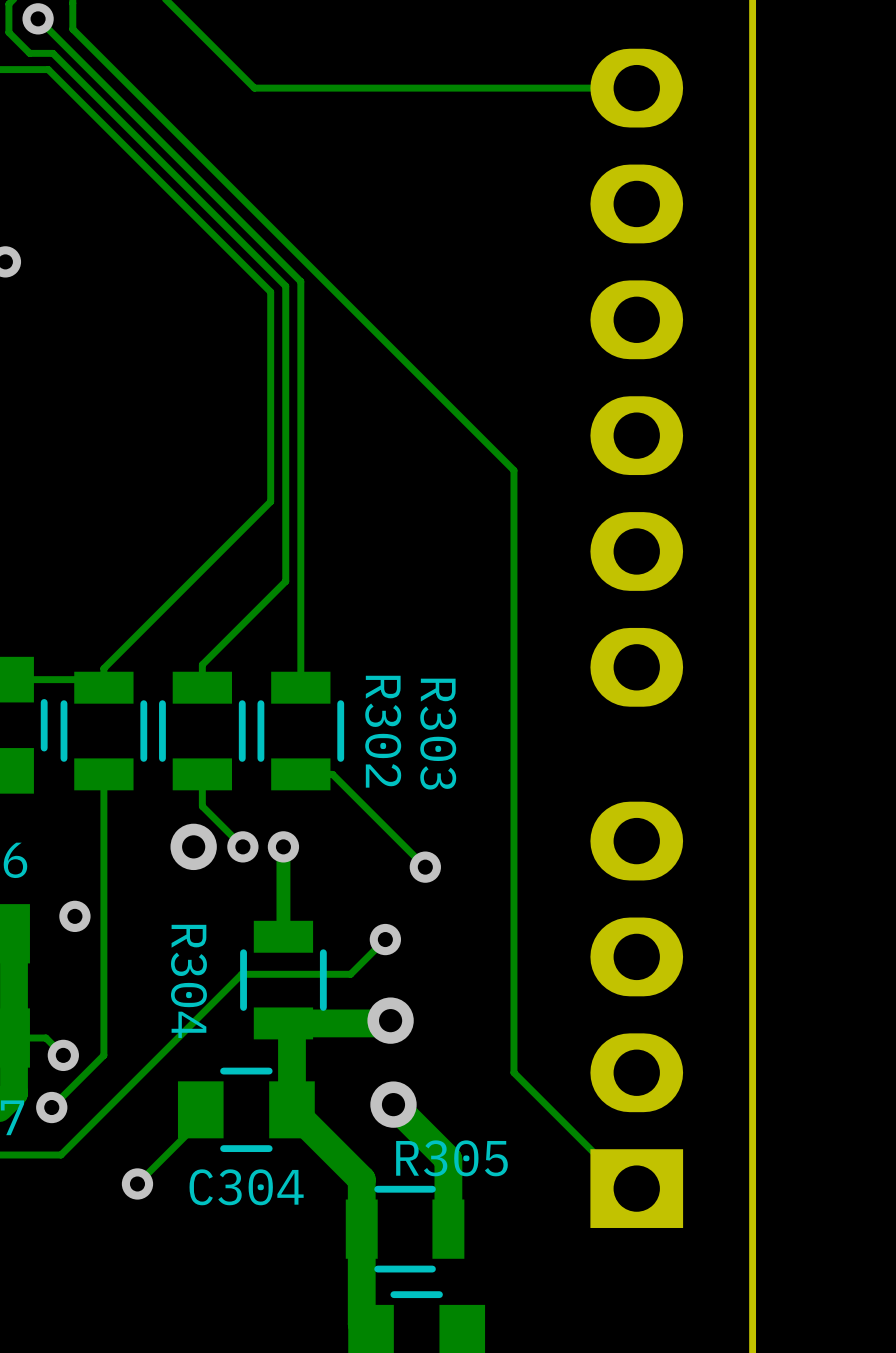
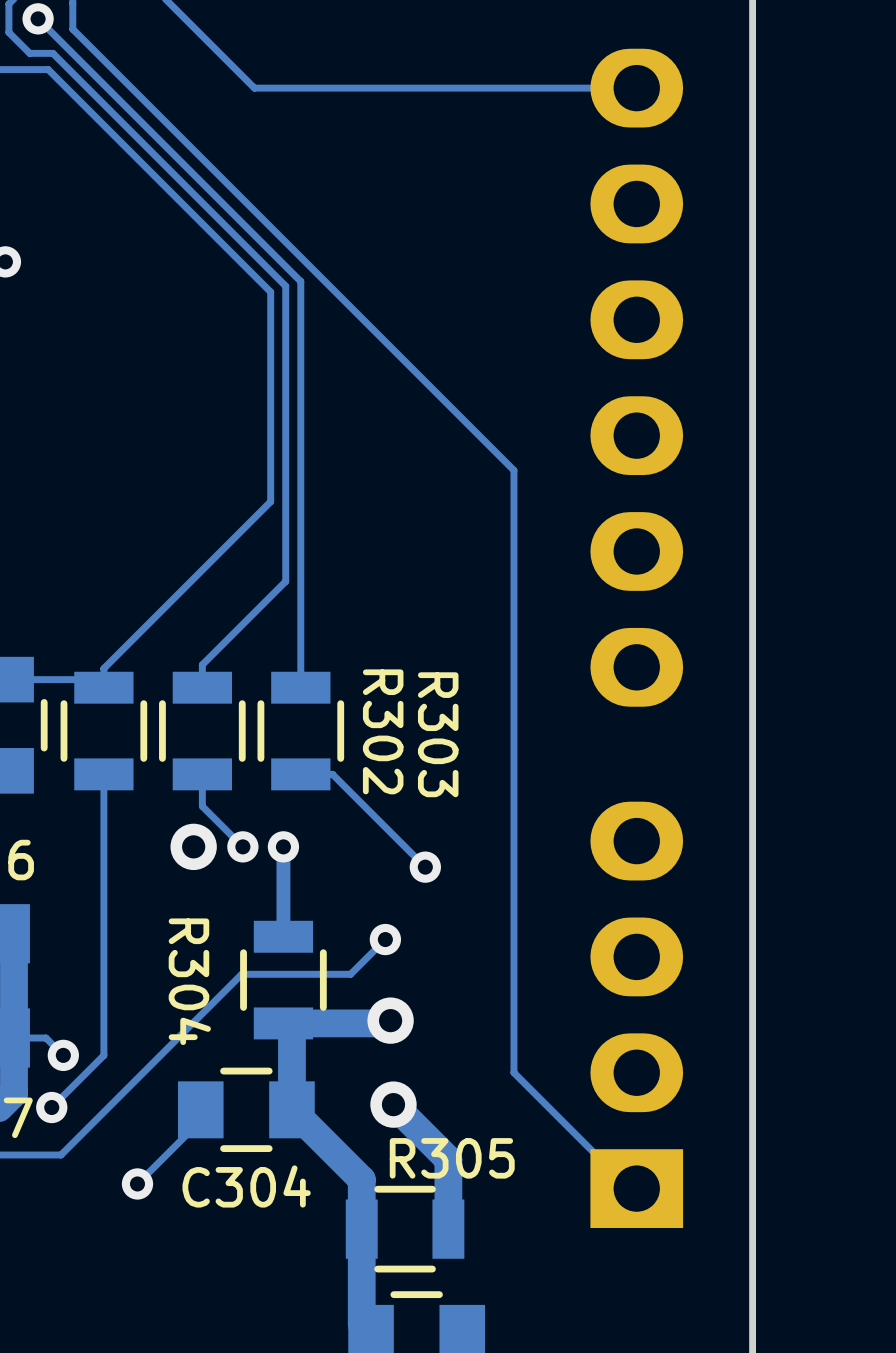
via: (74, 916) -> none

